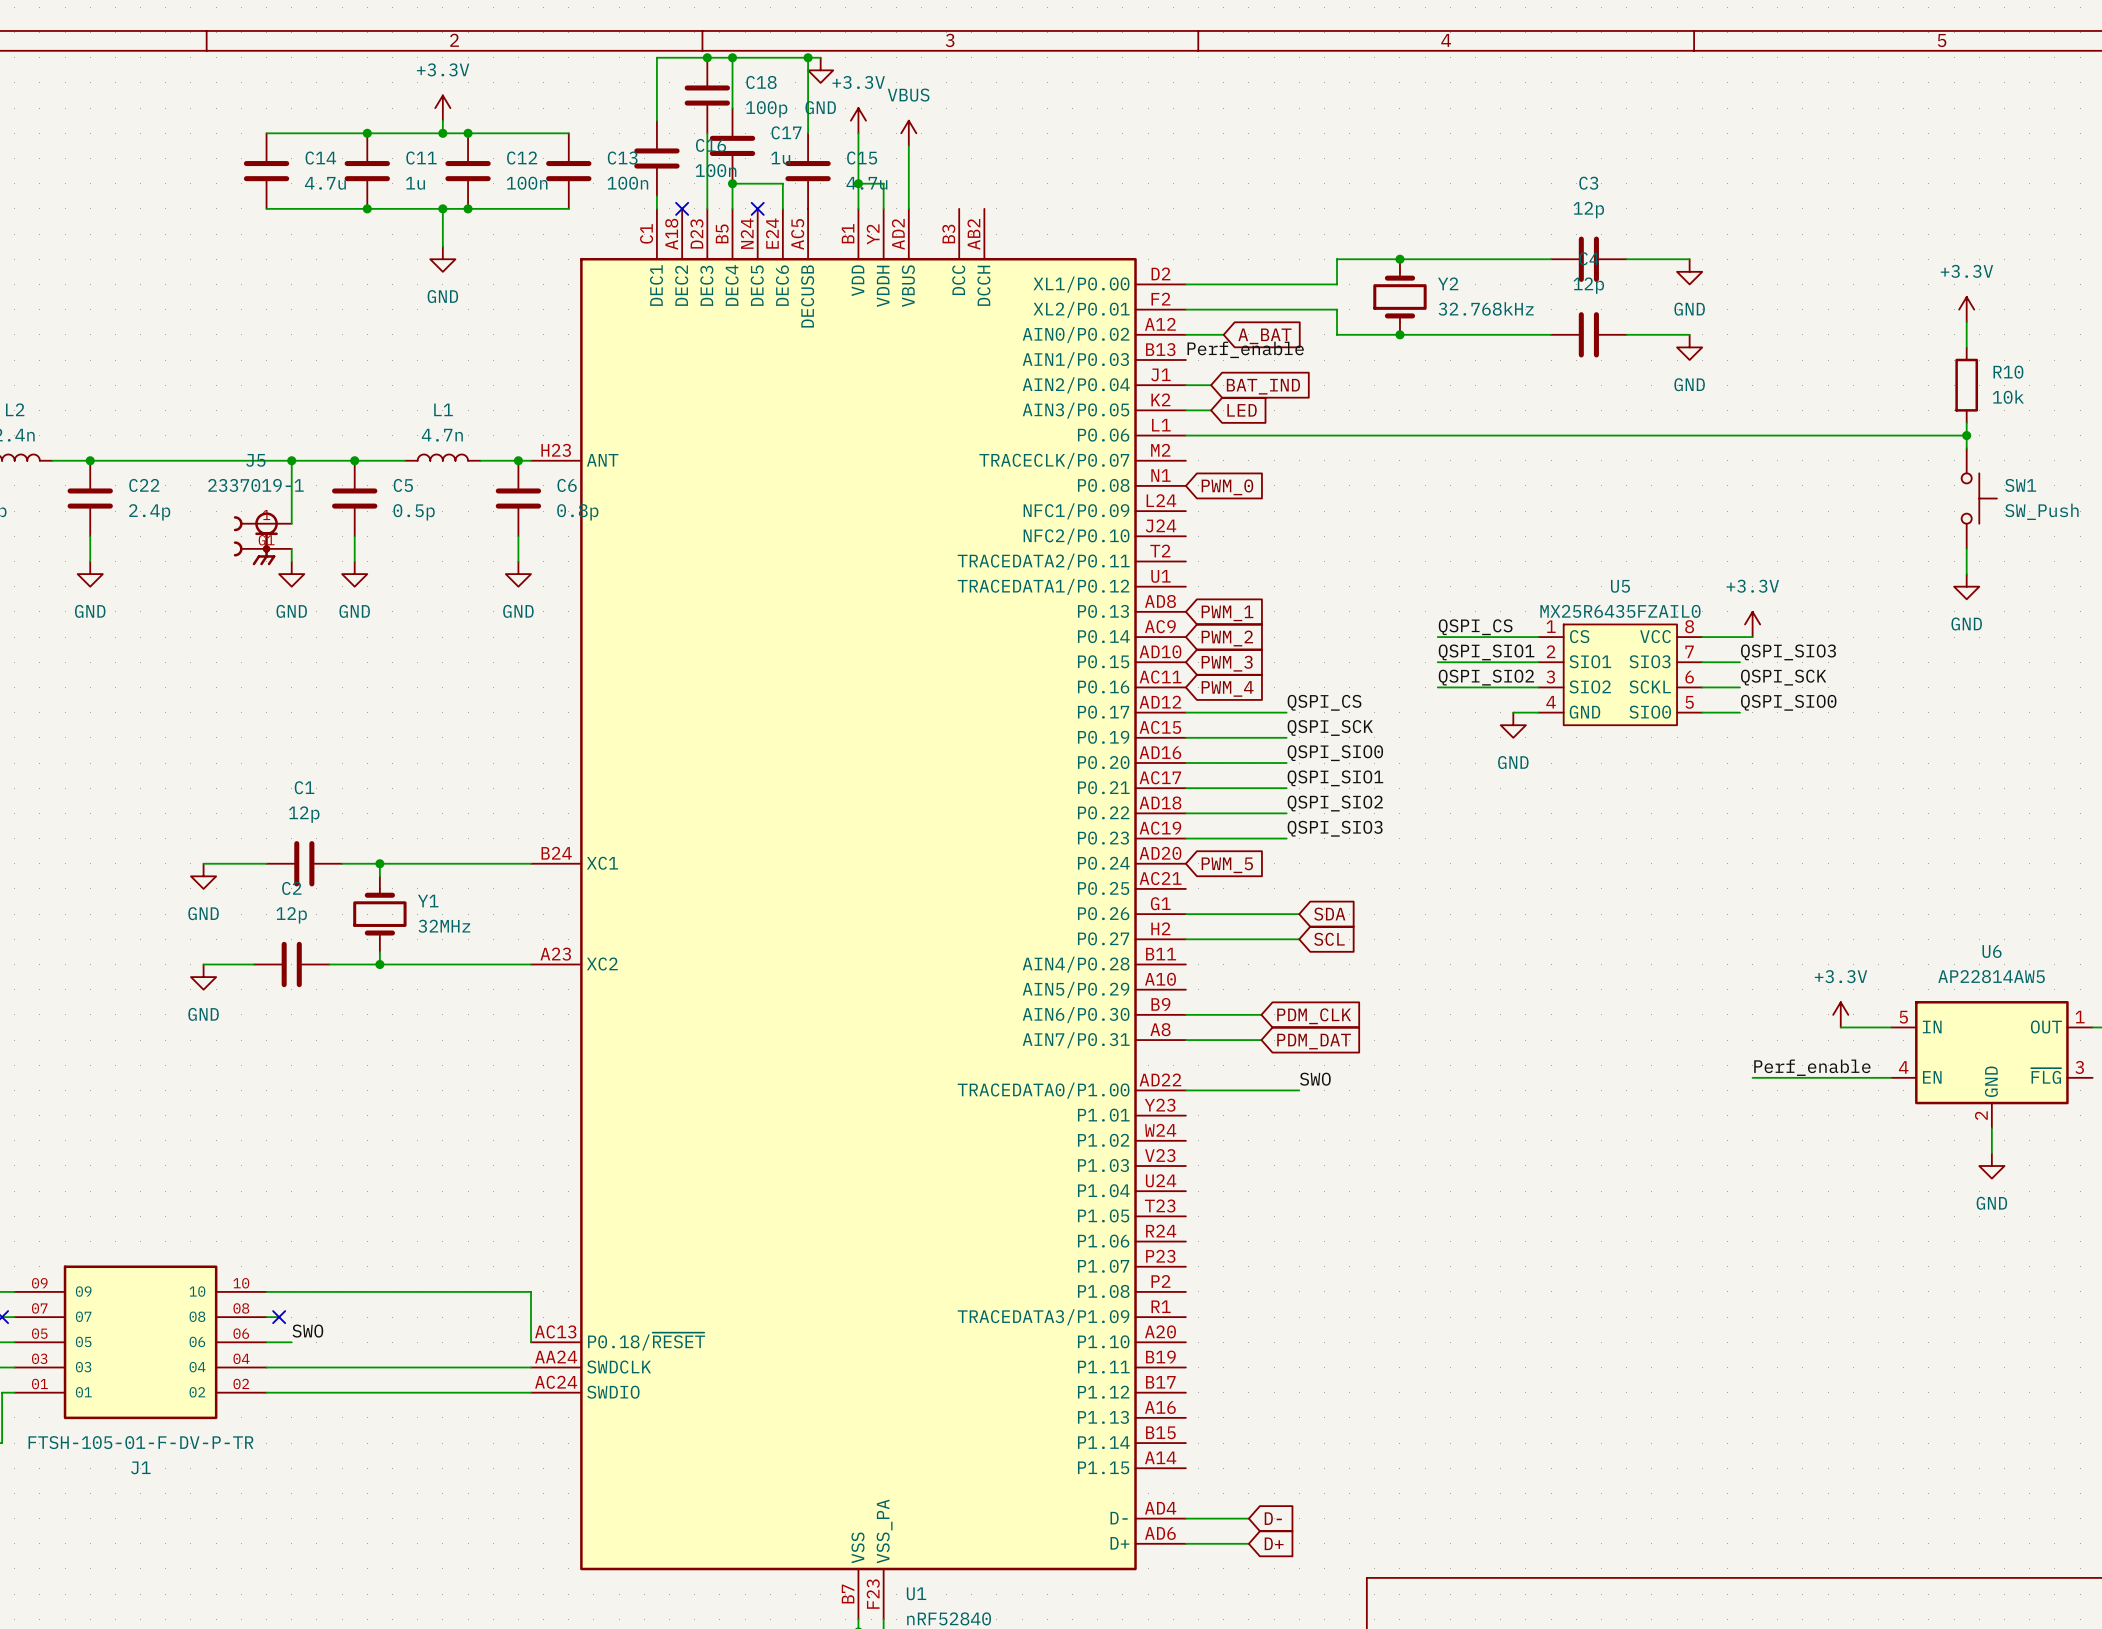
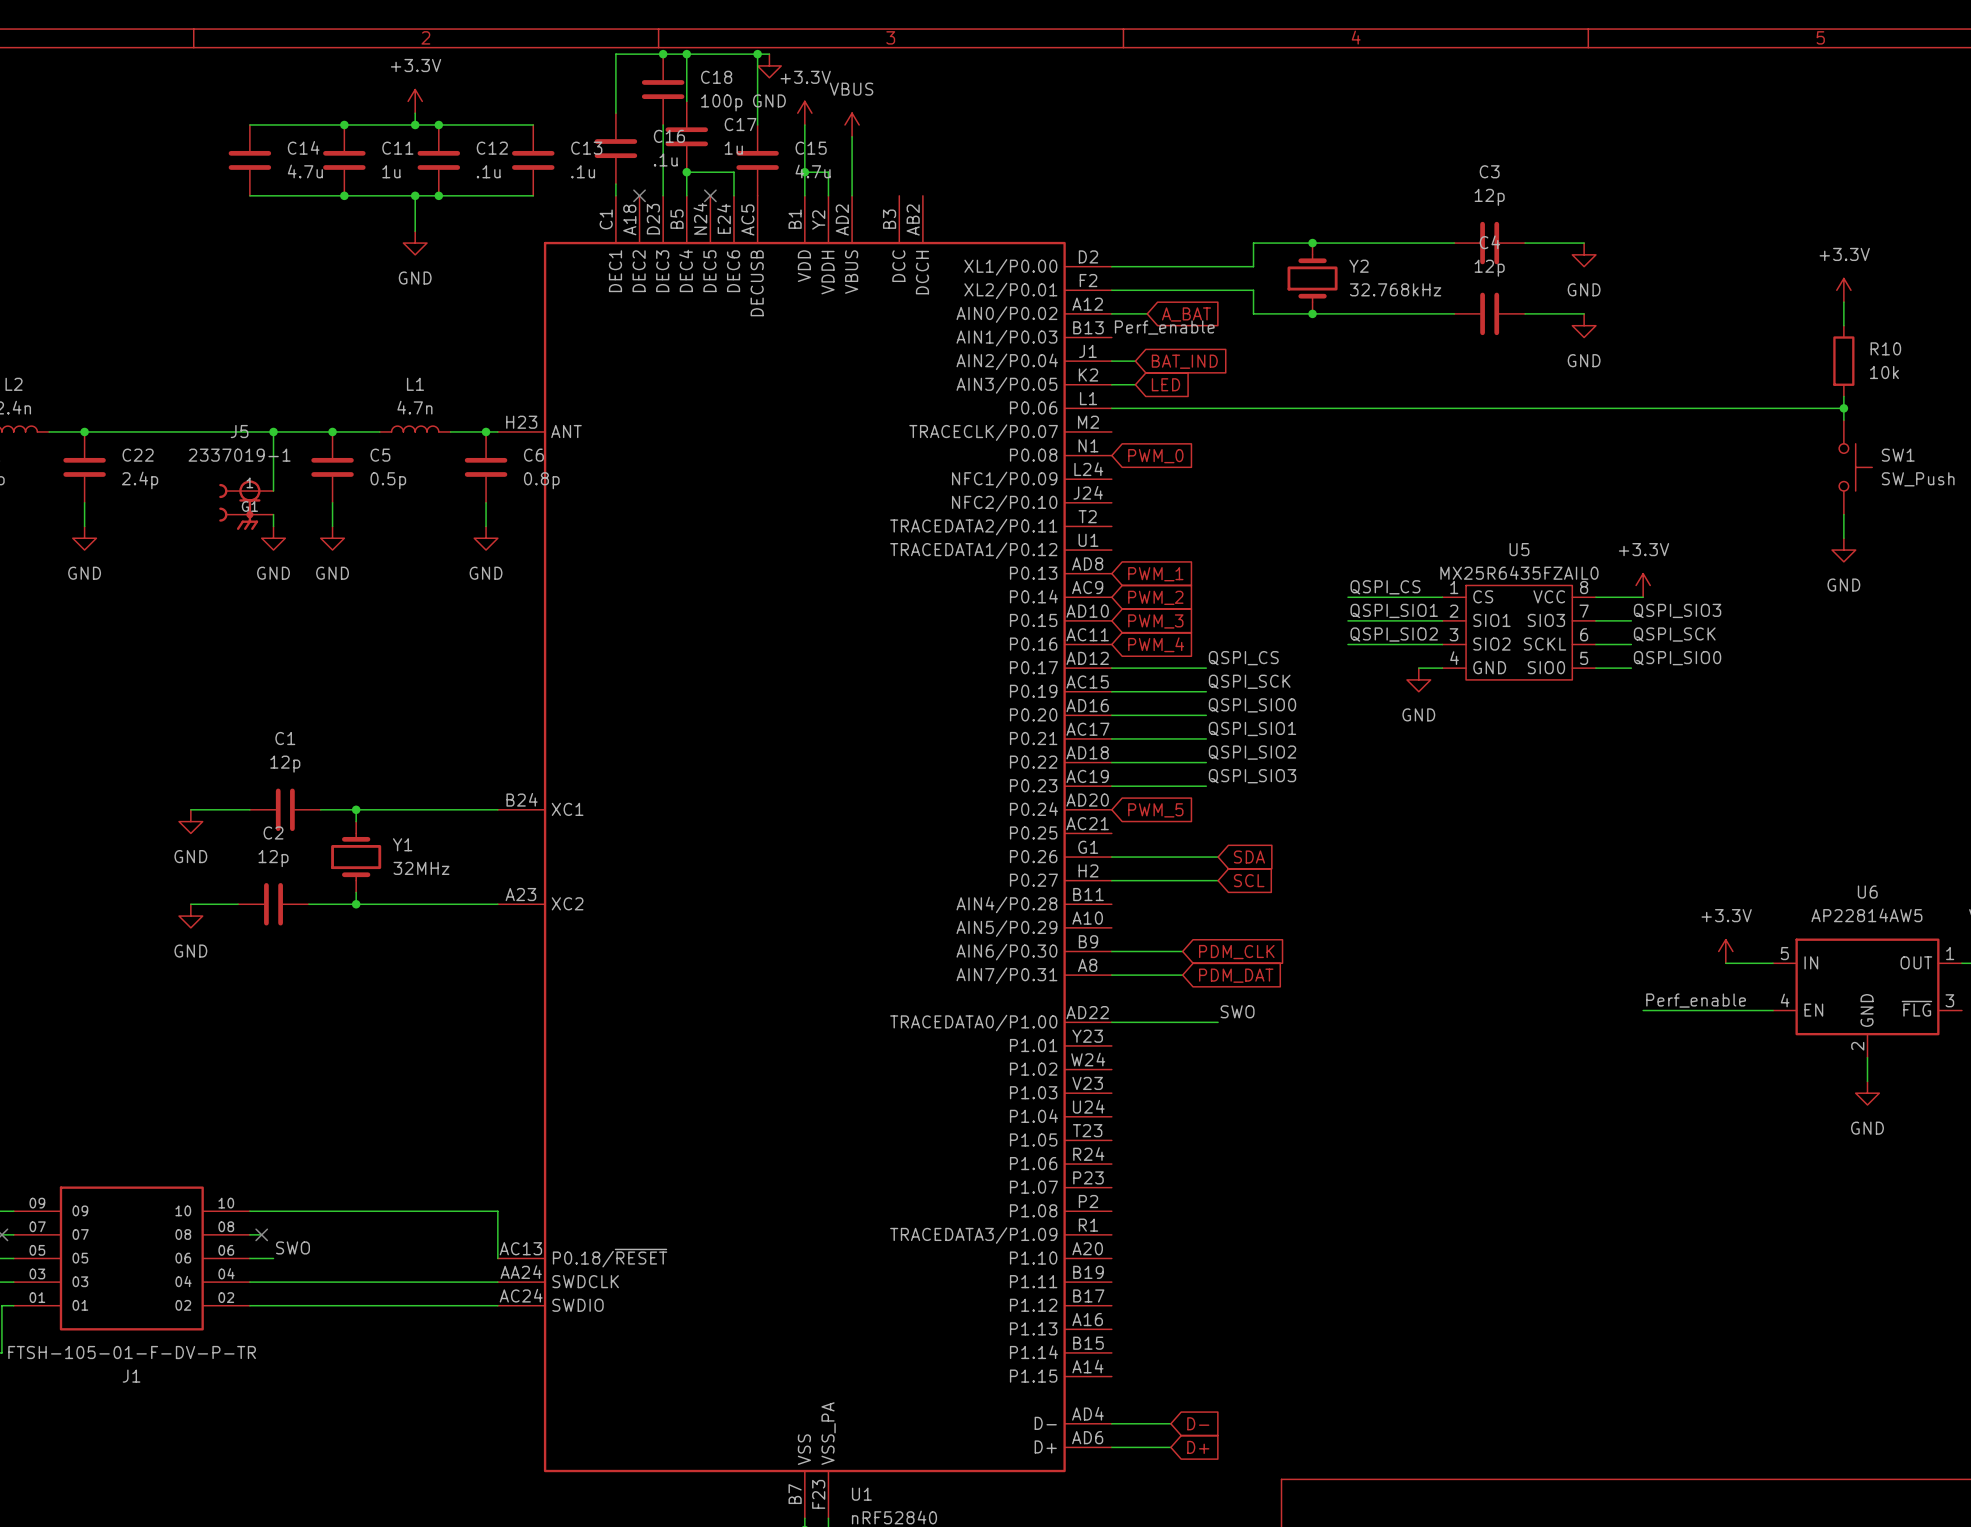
C16 value: 100n (716, 170) -> .1u (665, 159)
C12 value: 100n (527, 183) -> .1u (488, 171)
C13 value: 100n (627, 183) -> .1u (583, 171)

